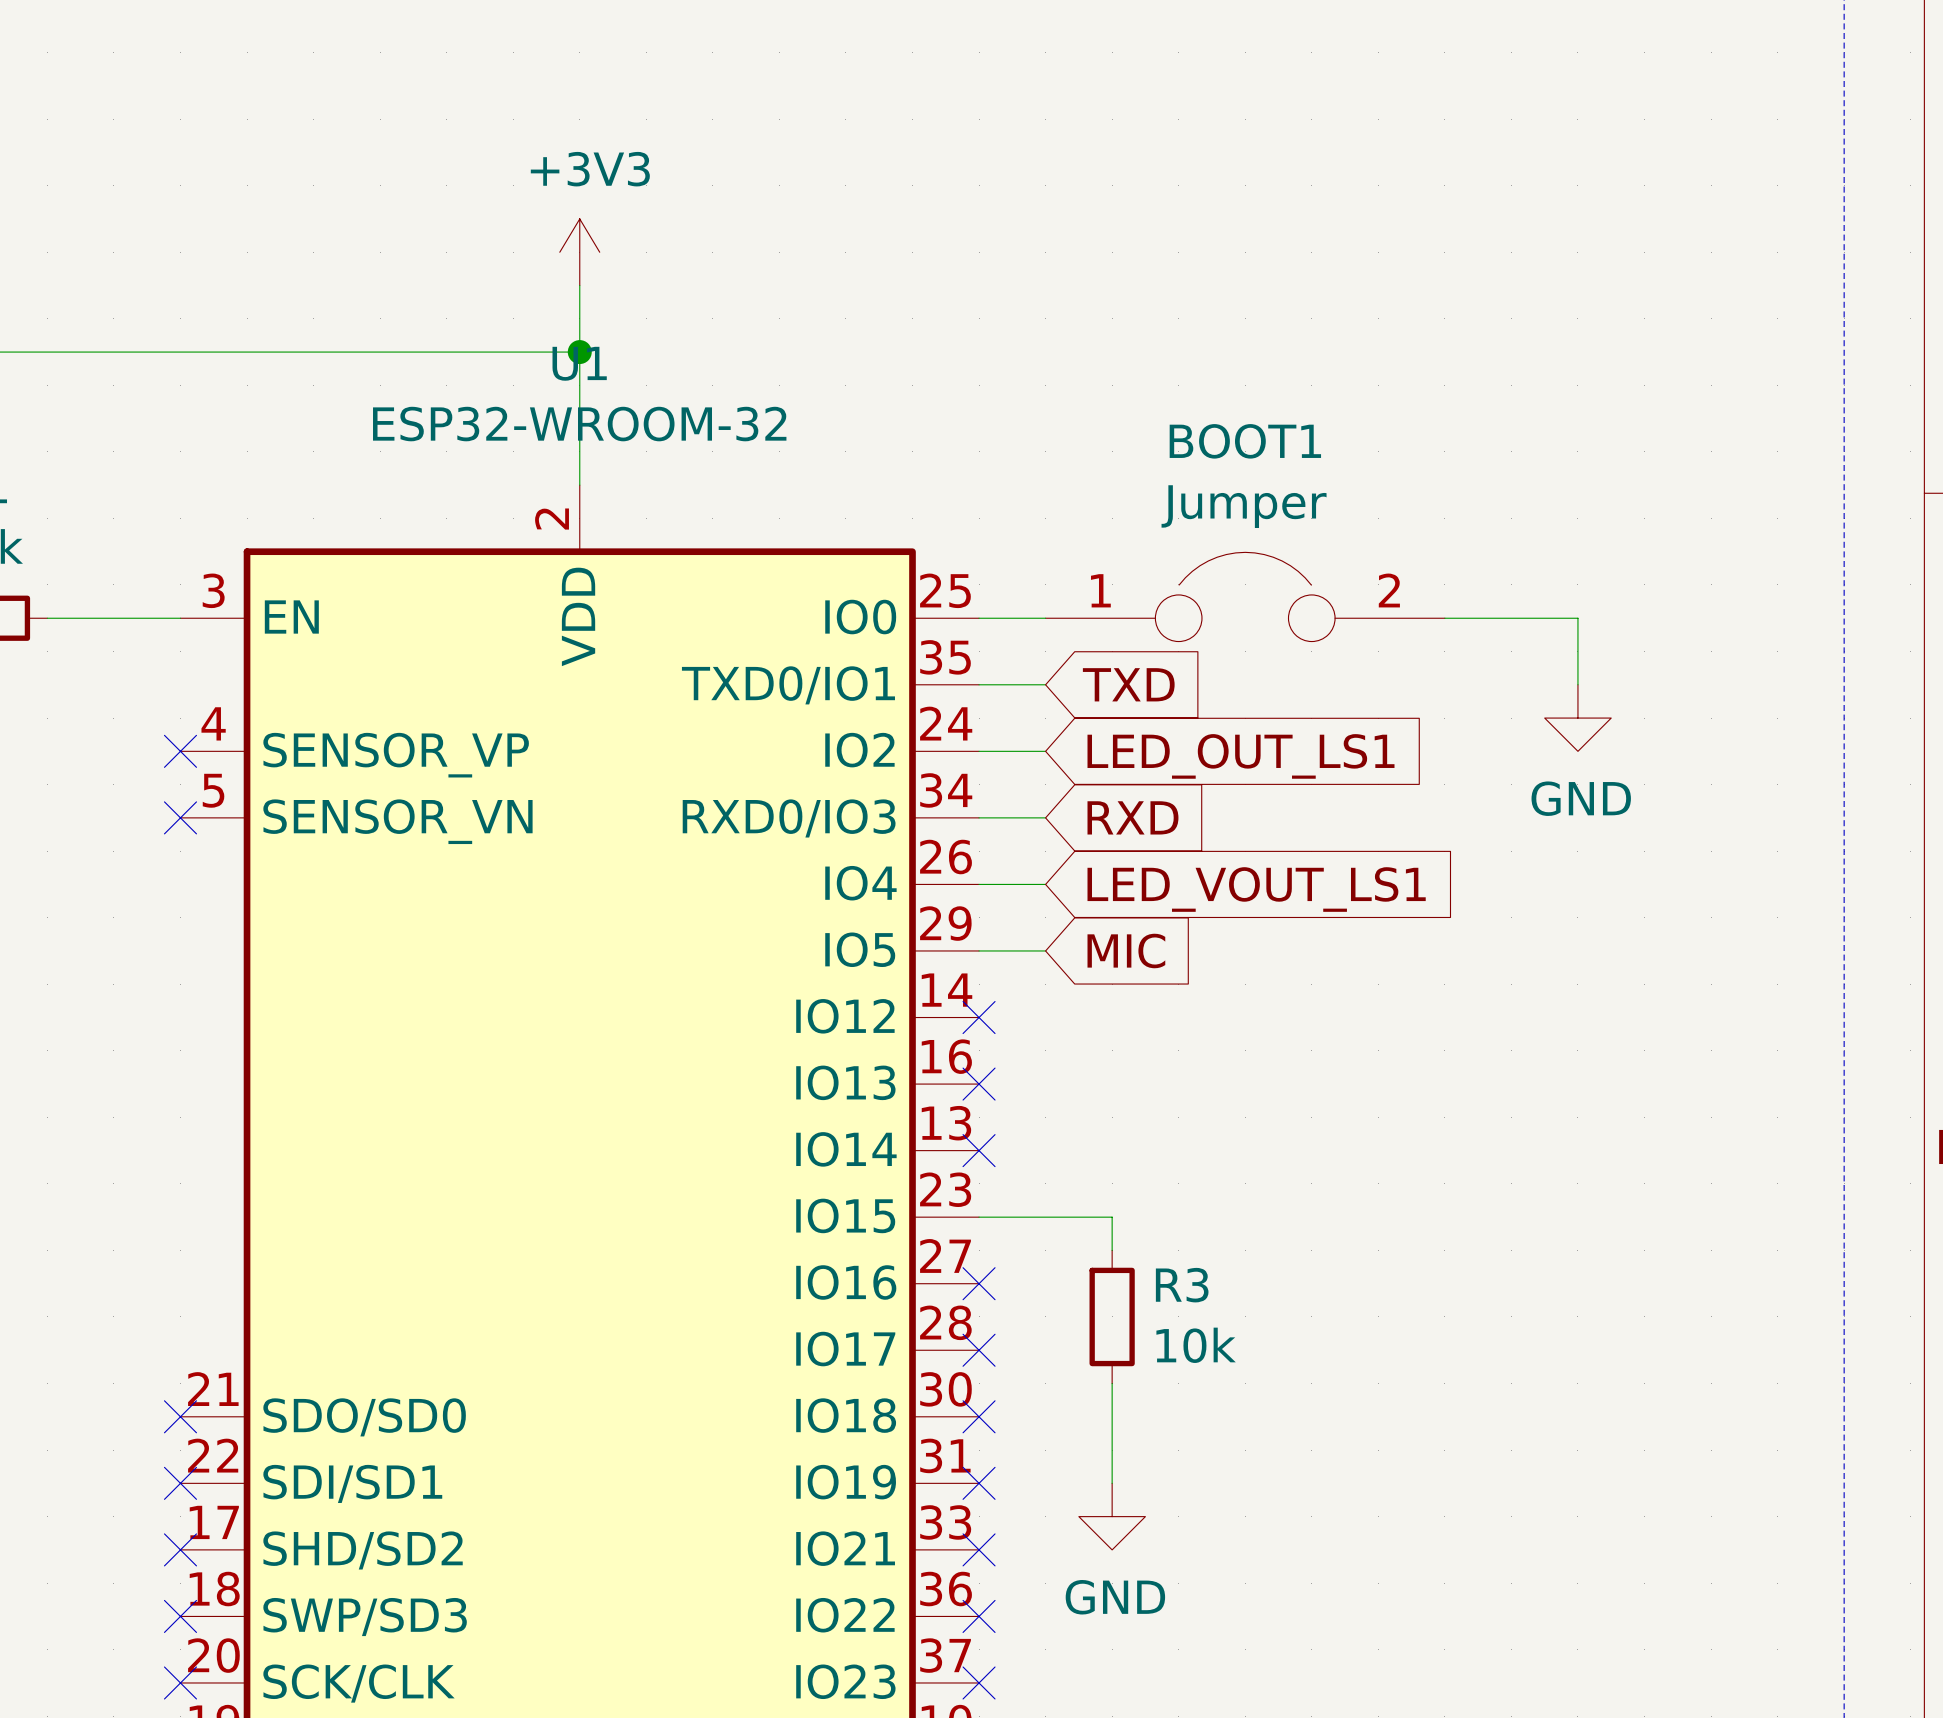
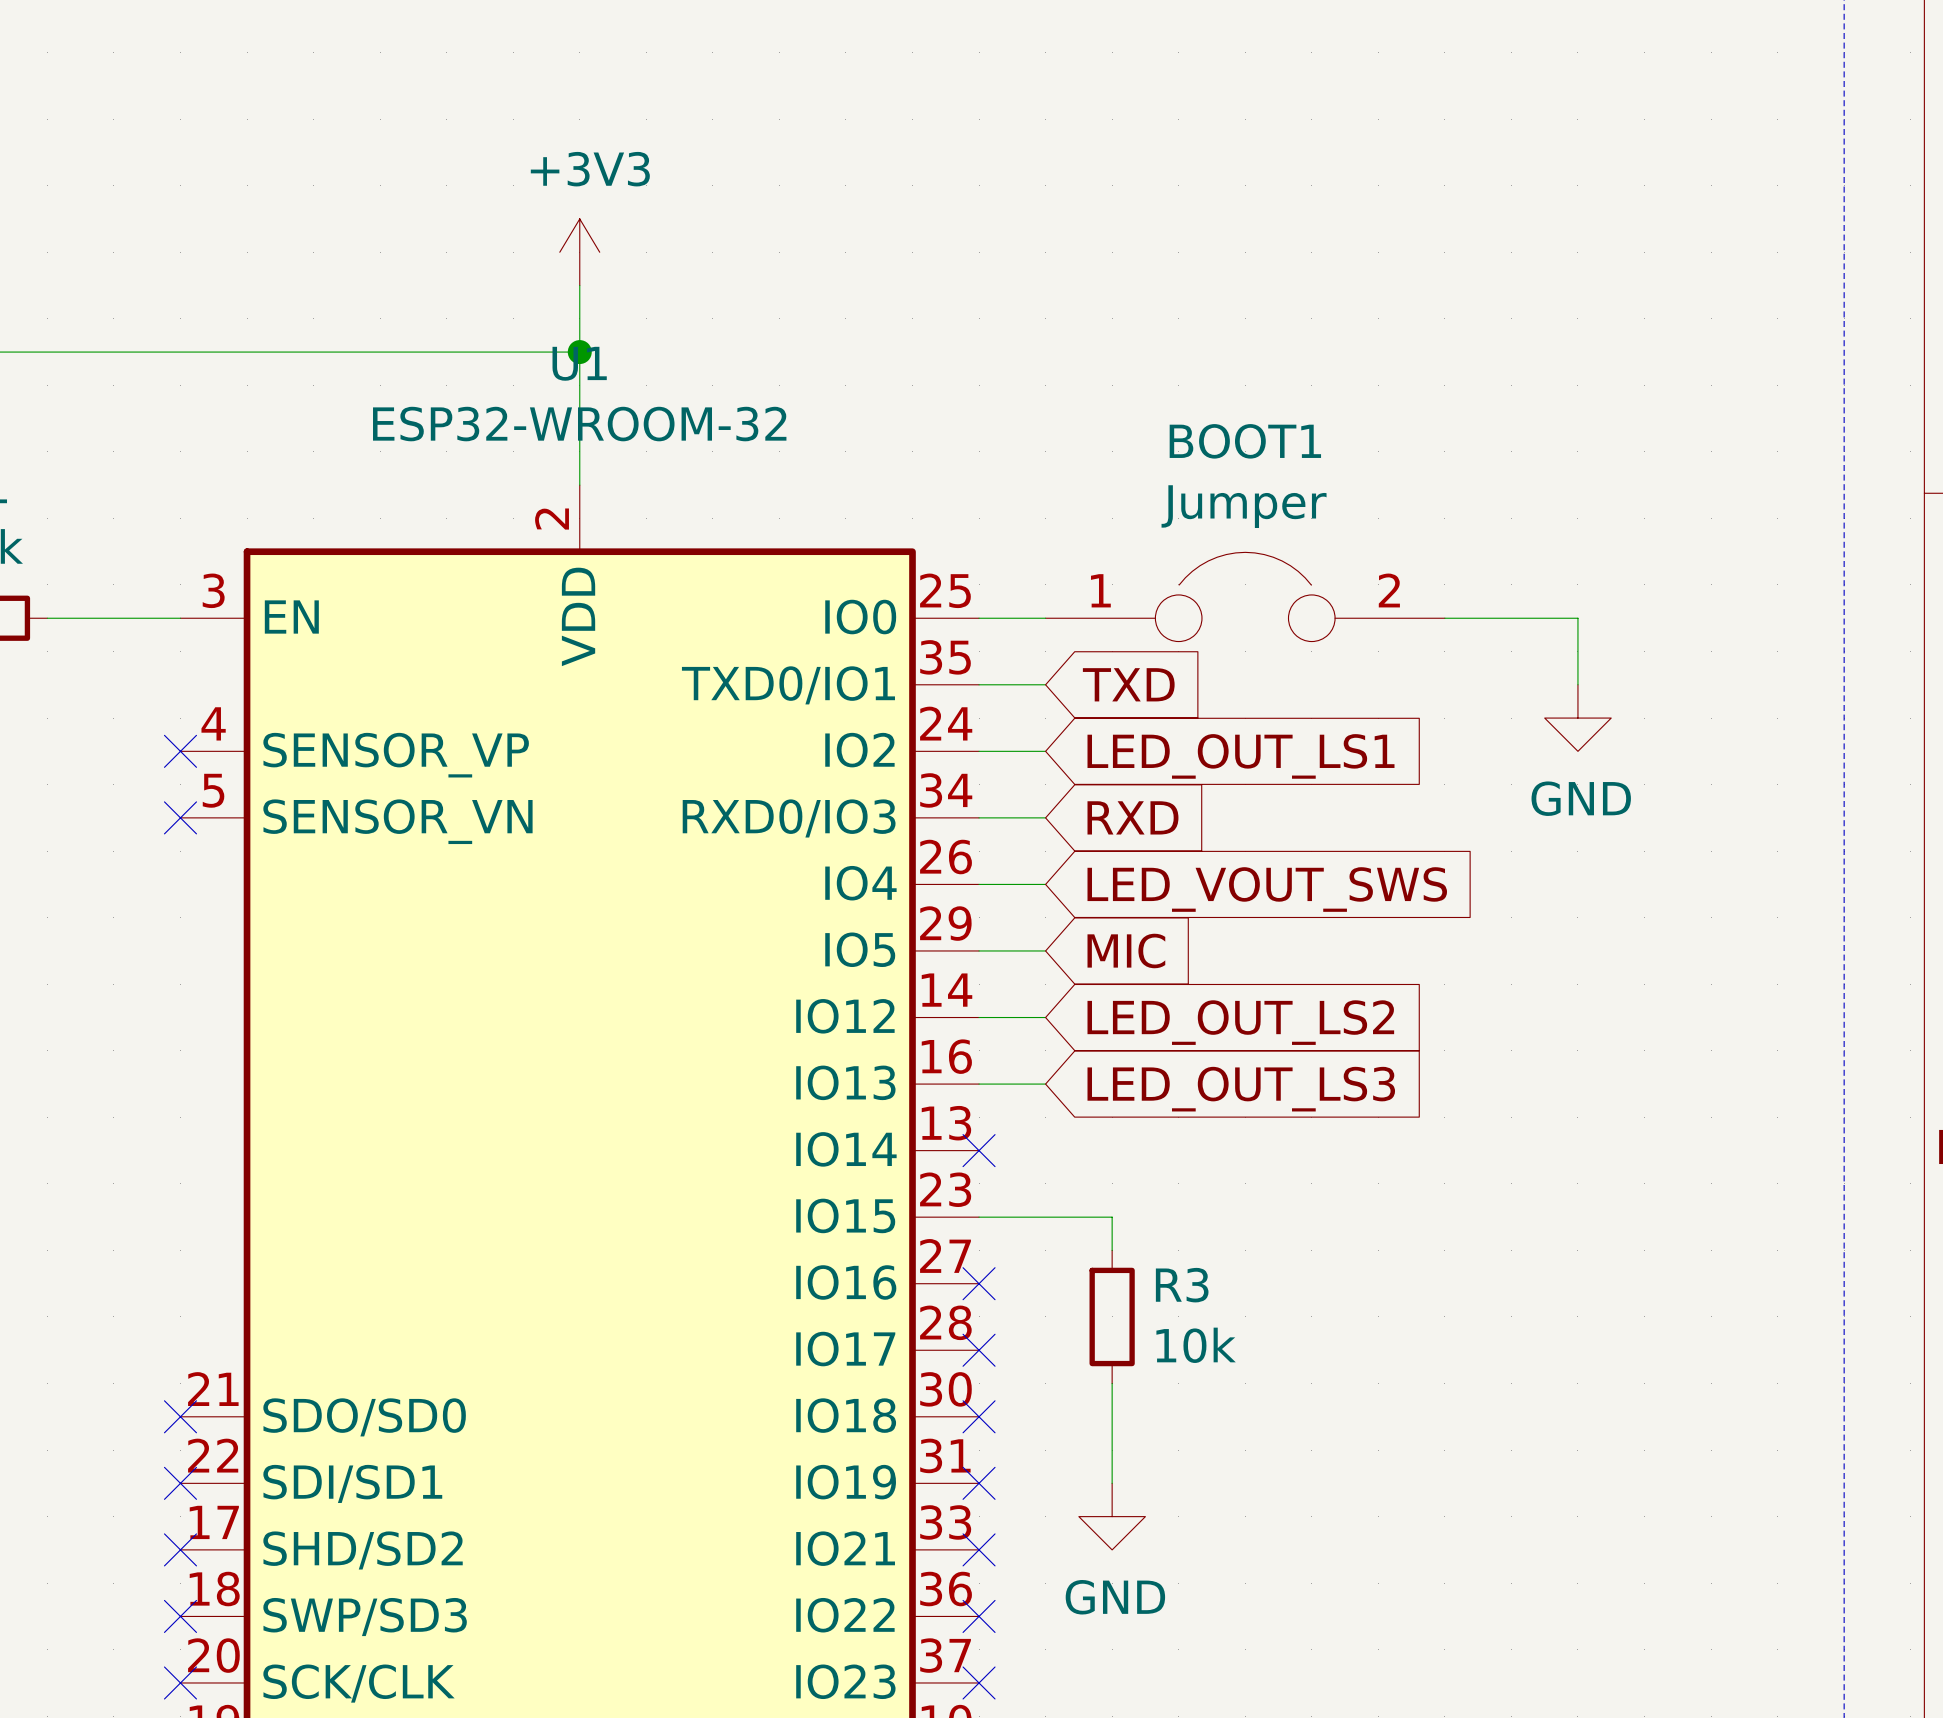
global label: LED_VOUT_LS1 (1256, 889) -> LED_VOUT_SWS (1267, 889)
wire: none -> (979, 1017) (1045, 1017)
no-connect mark: (979, 1017) -> none
global label: none -> LED_OUT_LS2 (1240, 1022)
wire: none -> (979, 1084) (1045, 1084)
no-connect mark: (979, 1084) -> none
global label: none -> LED_OUT_LS3 (1241, 1089)

